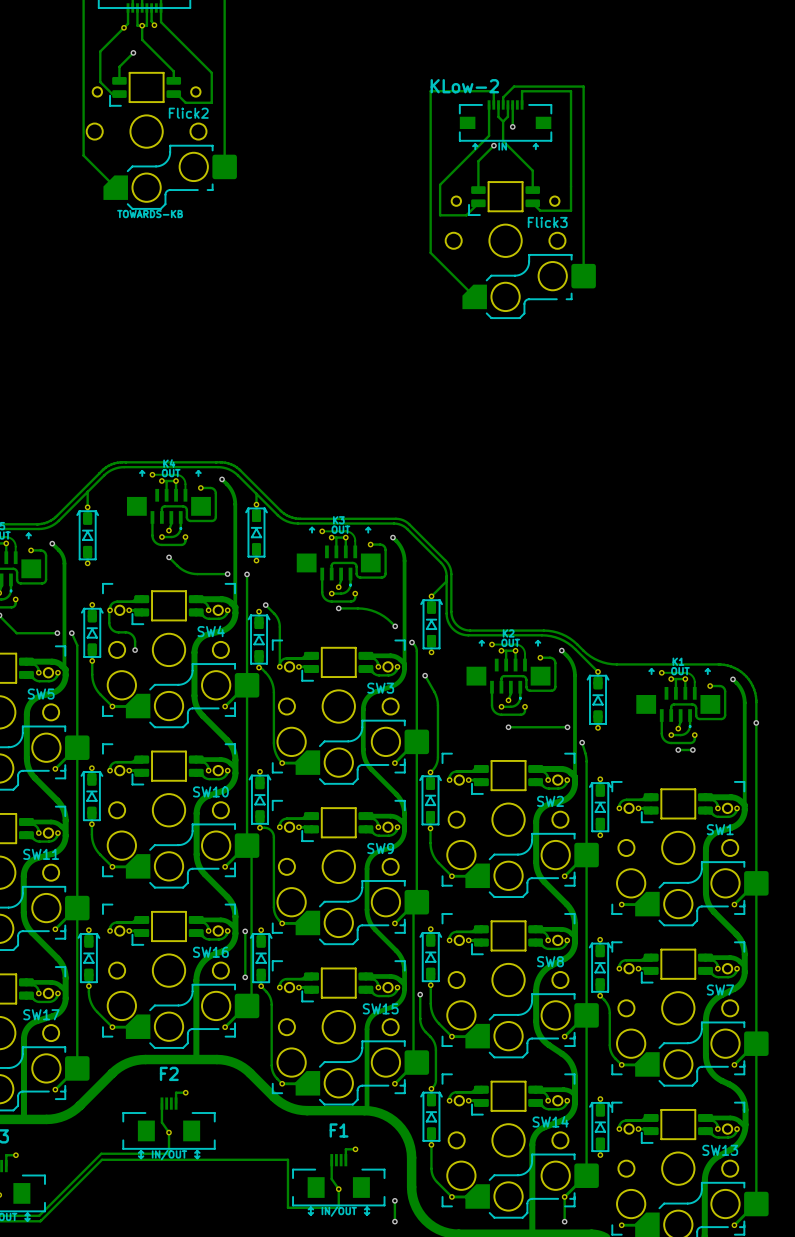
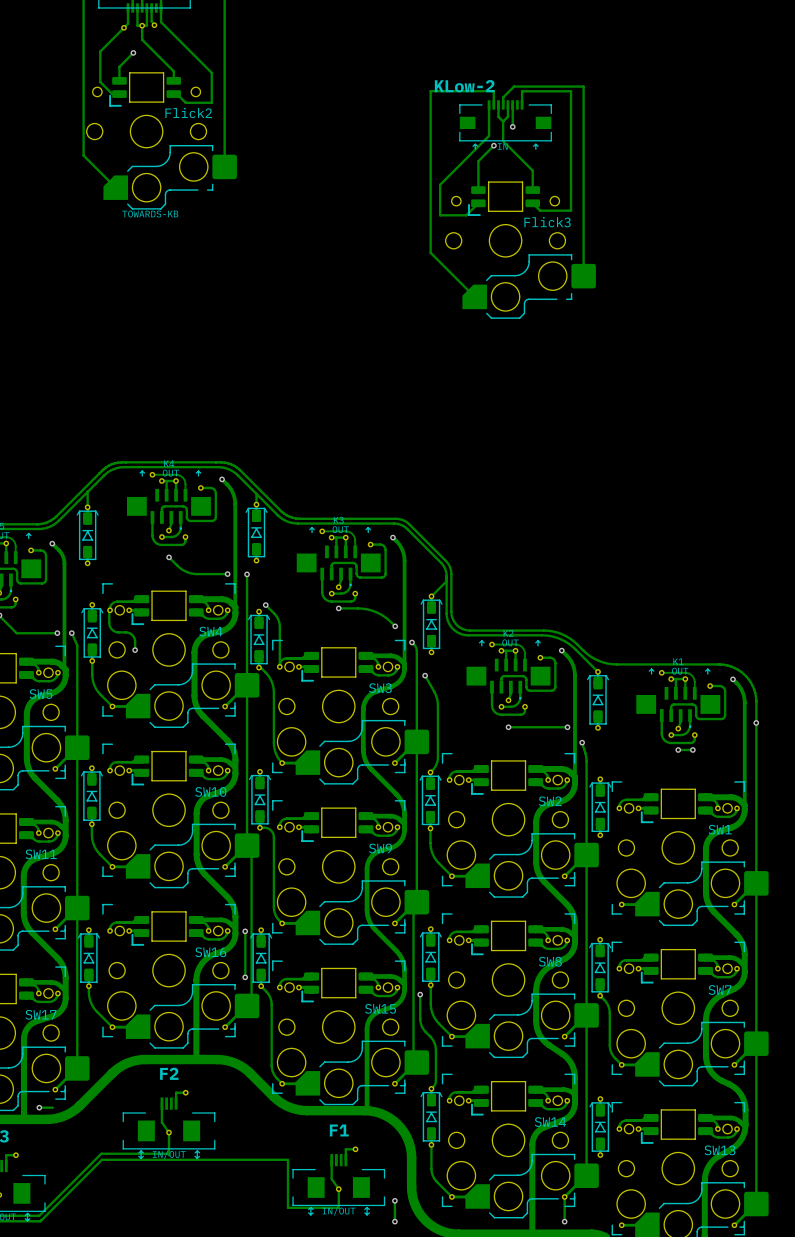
via: none -> (39, 1107)
track: none -> (52, 1107) (39, 1107)

